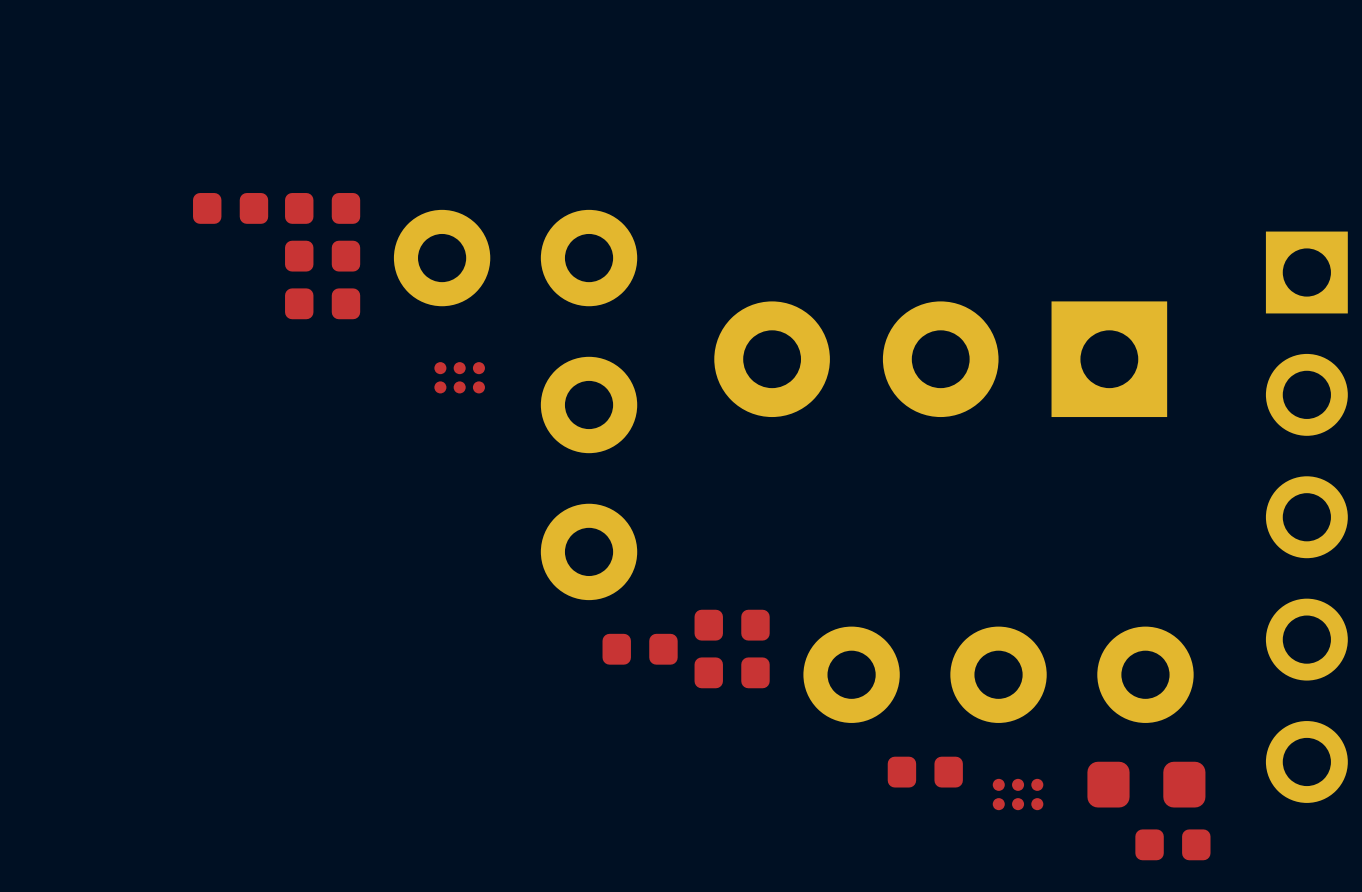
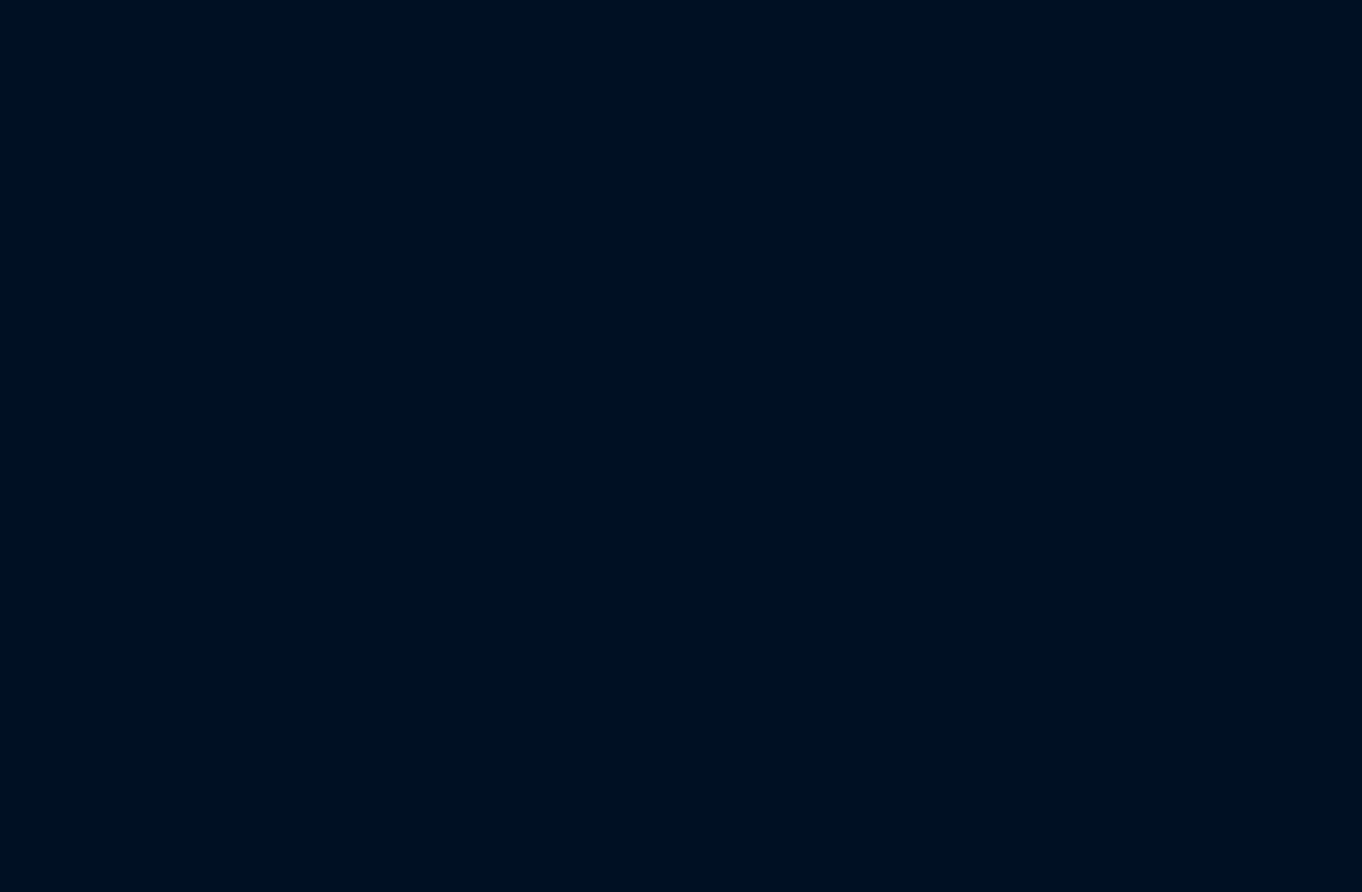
part: (230, 208) -> none
part: (322, 208) -> none
part: (322, 256) -> none
part: (442, 258) -> none
part: (589, 258) -> none
part: (322, 303) -> none
part: (940, 359) -> none
part: (459, 377) -> none
part: (589, 404) -> none
part: (1306, 517) -> none
part: (589, 551) -> none
part: (732, 625) -> none
part: (640, 649) -> none
part: (732, 672) -> none
part: (851, 674) -> none
part: (998, 674) -> none
part: (1145, 674) -> none
part: (925, 772) -> none
part: (1146, 784) -> none
part: (1018, 794) -> none
part: (1172, 844) -> none

